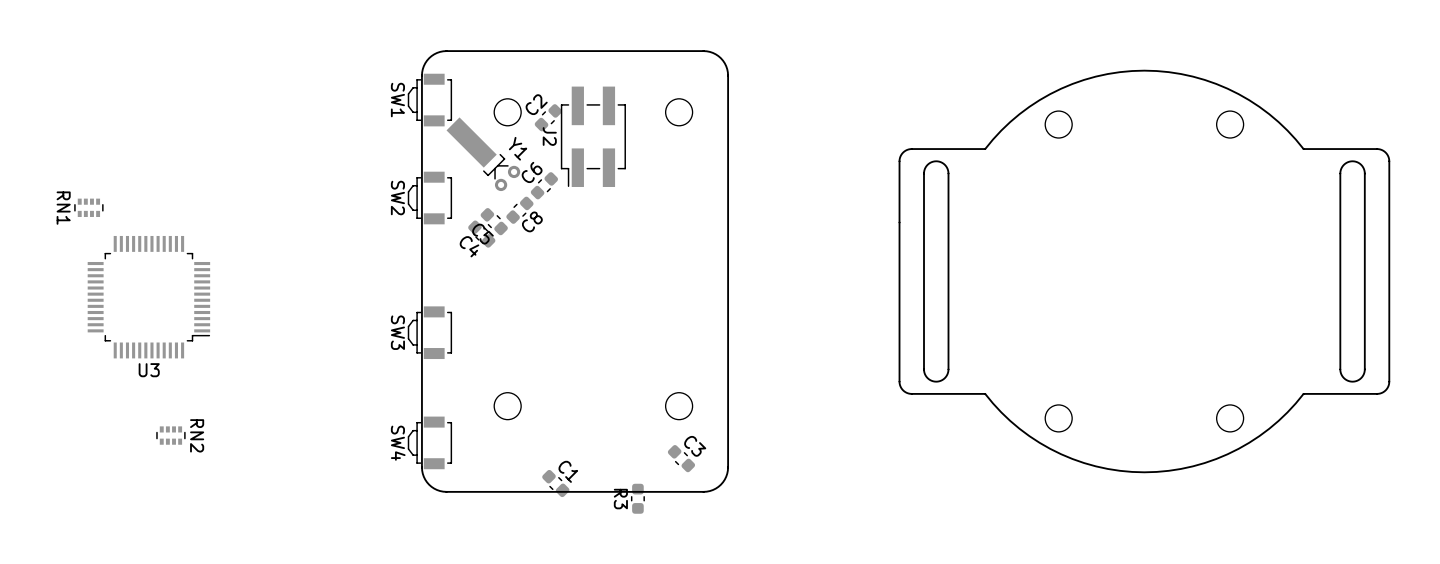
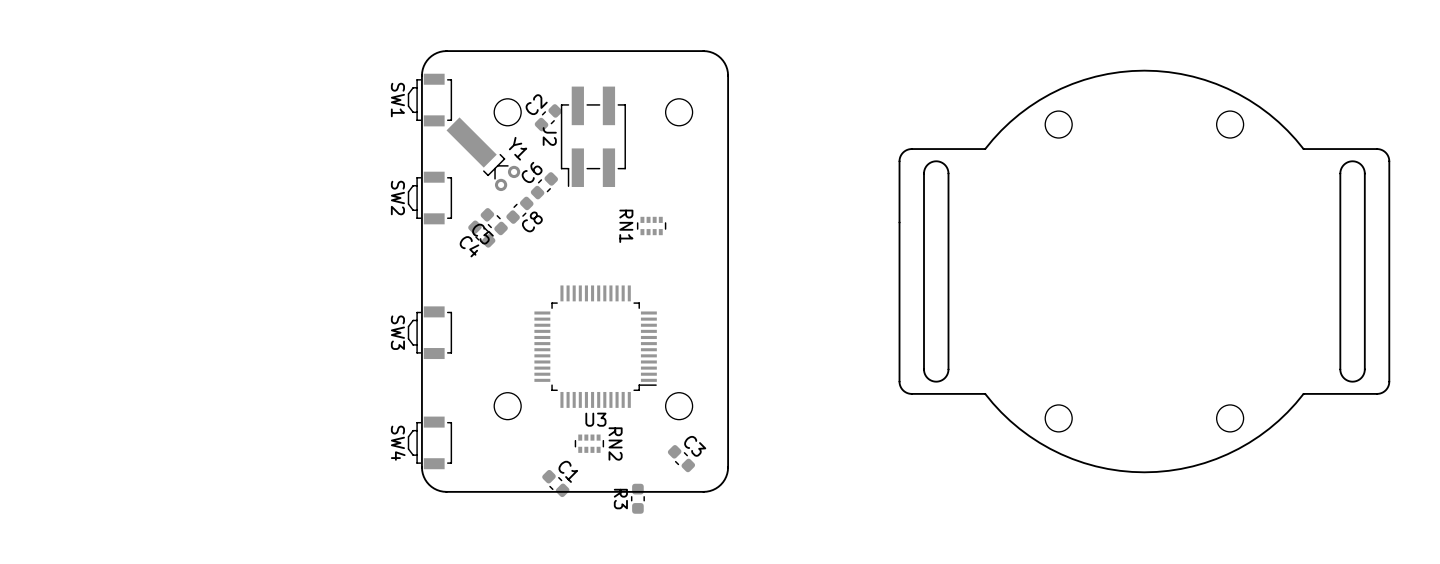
RN1 position: (88, 207) -> (651, 225)
U3 position: (148, 297) -> (595, 346)
RN2 position: (170, 435) -> (589, 443)

